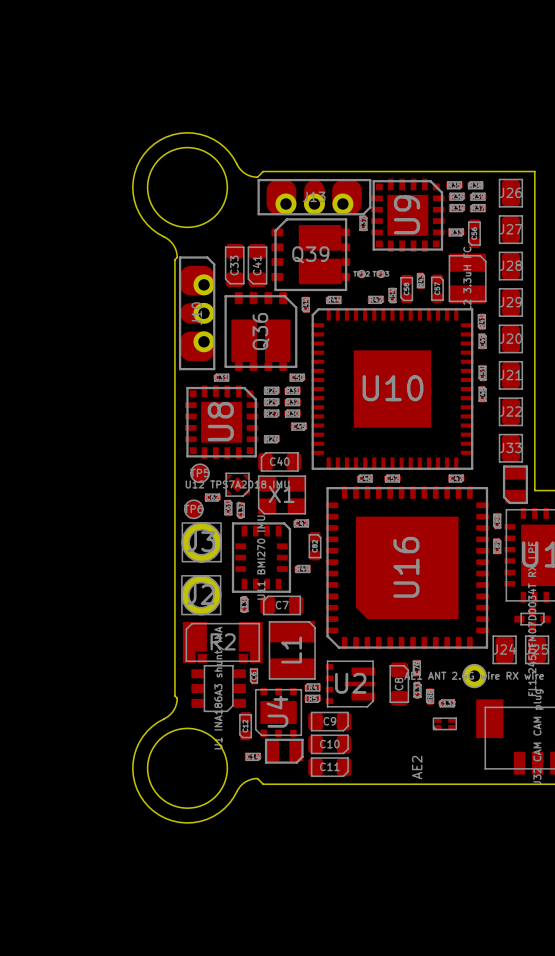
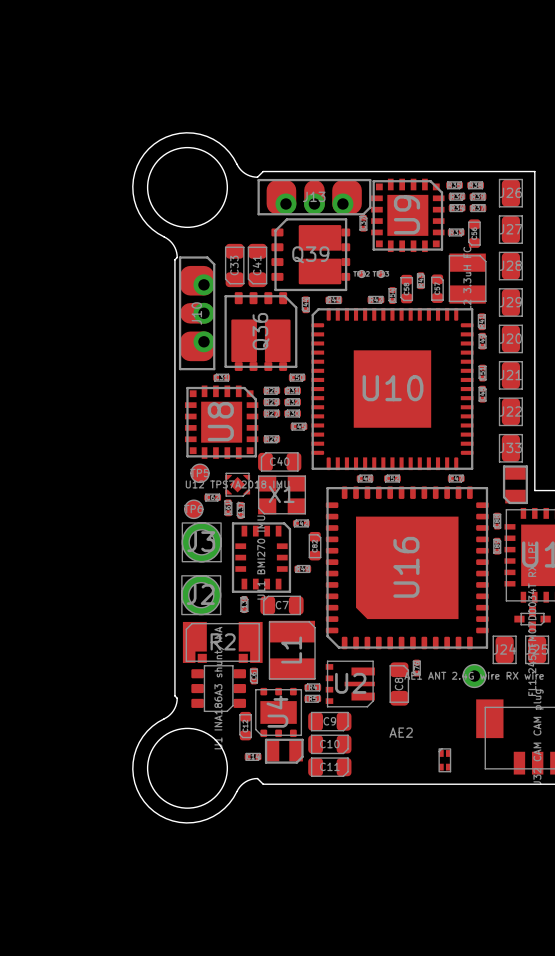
part: (417, 690) -> none
part: (430, 696) -> none
part: (447, 703) -> none
AE2 rotation: 0° (444, 723) -> 90° clockwise (444, 760)
AE2 position: (444, 723) -> (444, 760)

